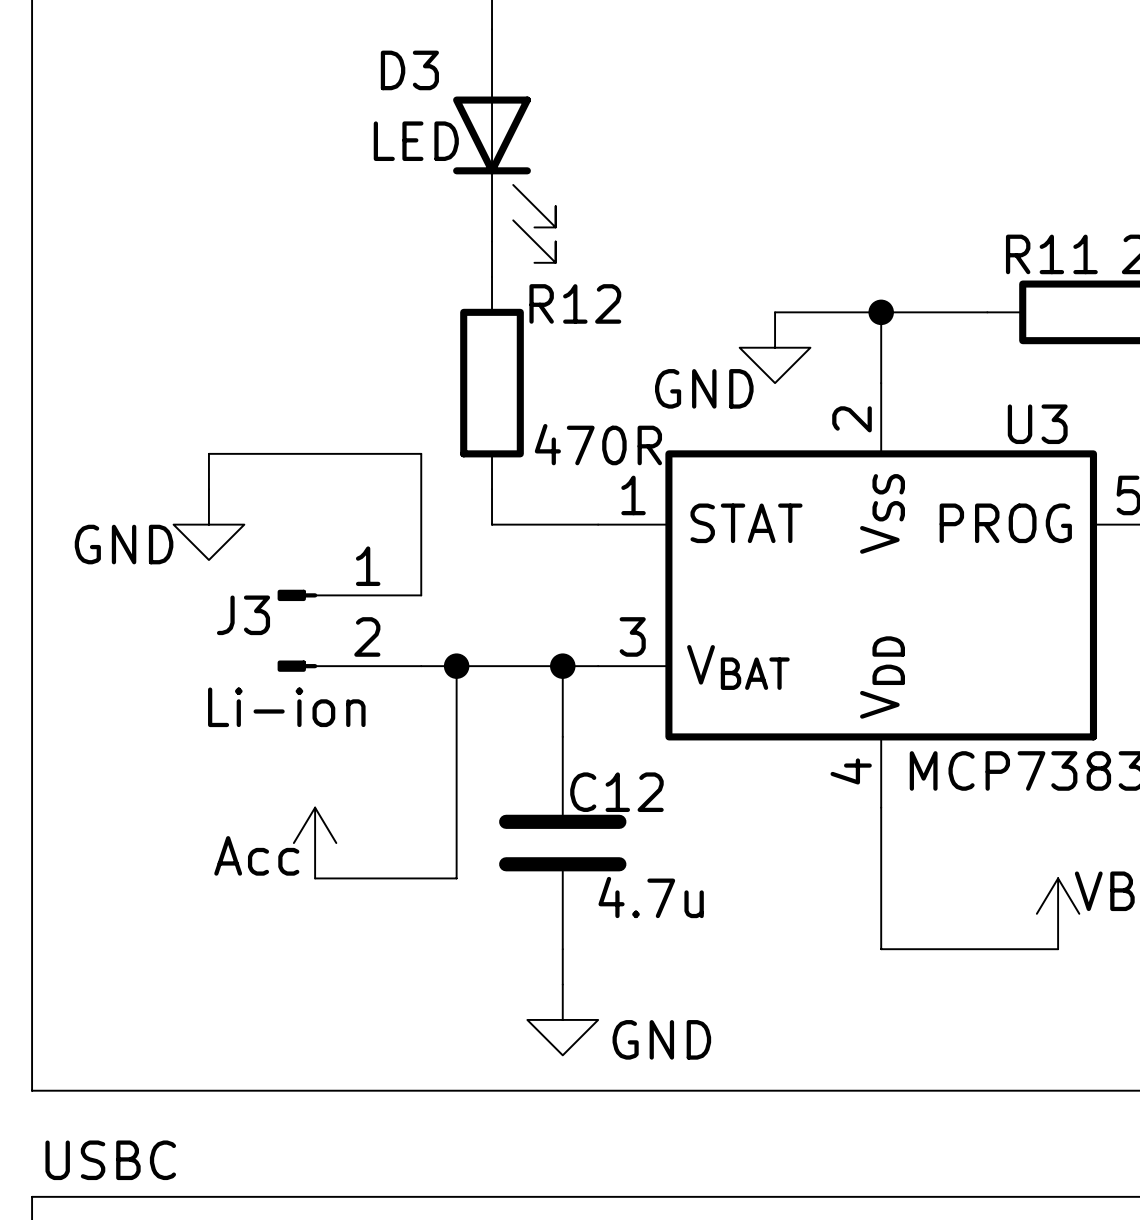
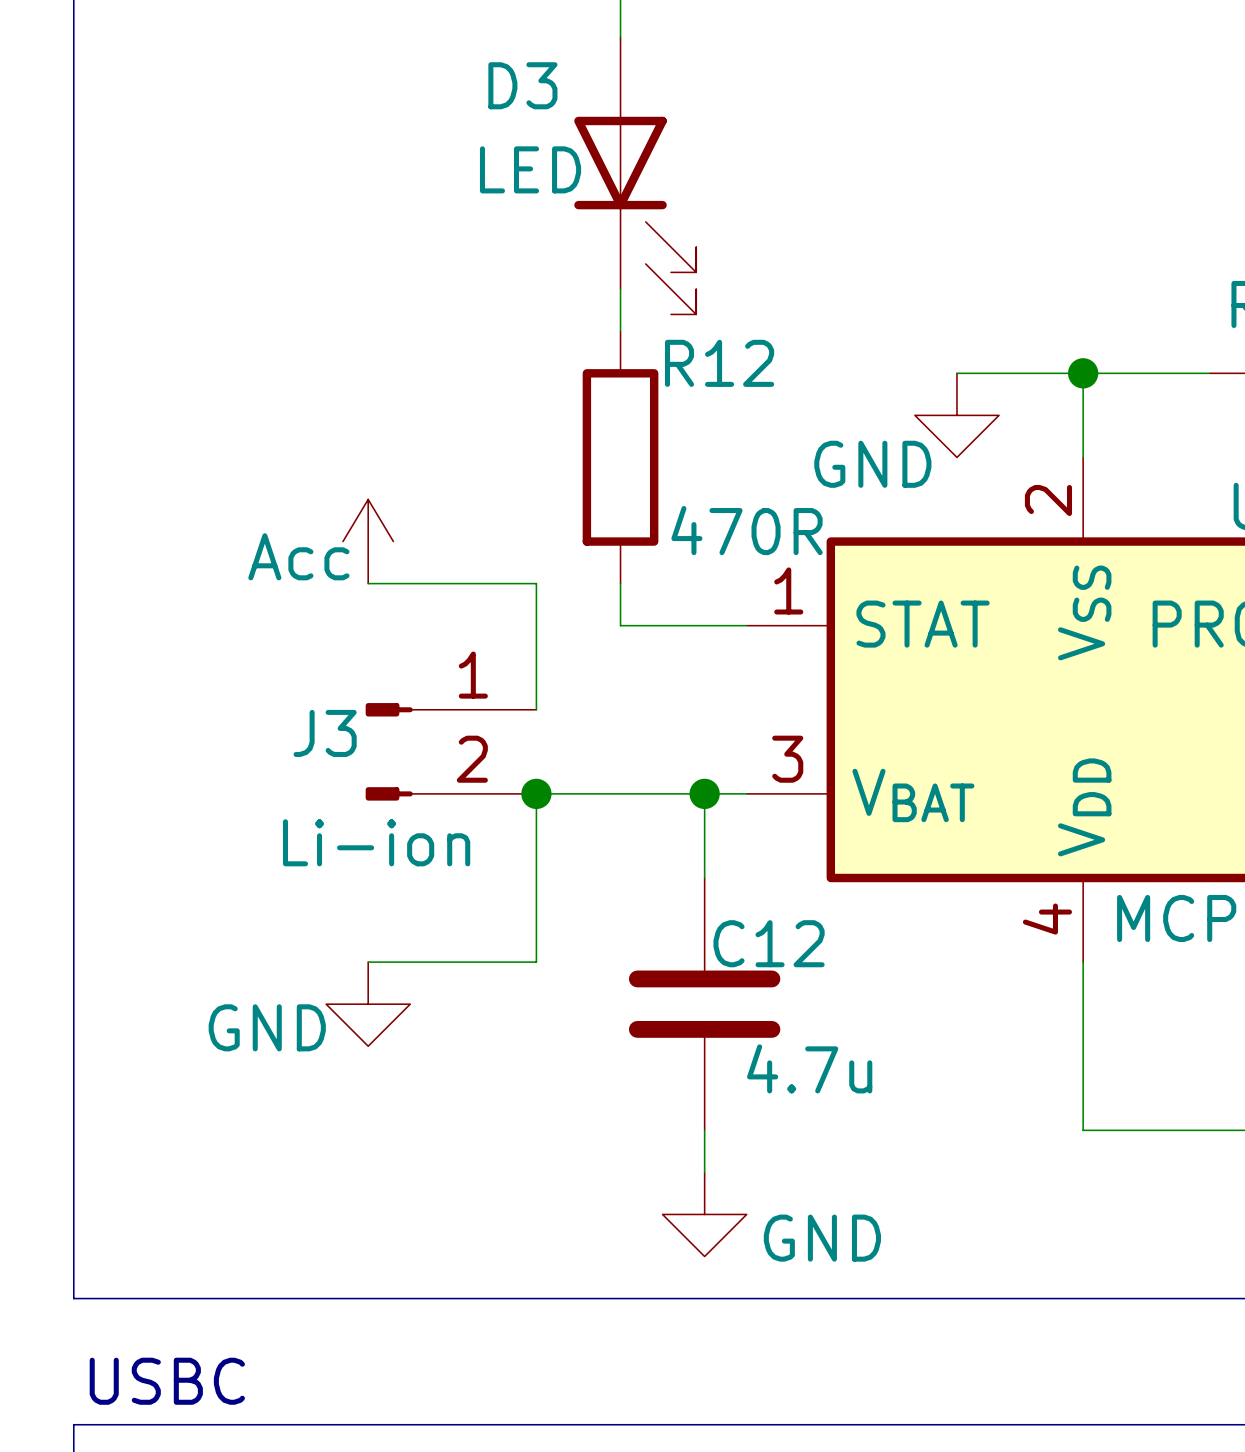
wire: (208, 489) (208, 453) (421, 453) (421, 489) -> (368, 583) (536, 583)
power symbol position: GND (208, 524) -> GND (368, 1004)
wire: none -> (536, 793) (536, 962) (368, 962)
wire: (456, 666) (456, 878) (315, 878) -> none
junction position: (456, 666) -> (536, 793)
power symbol position: Acc (315, 843) -> Acc (368, 541)

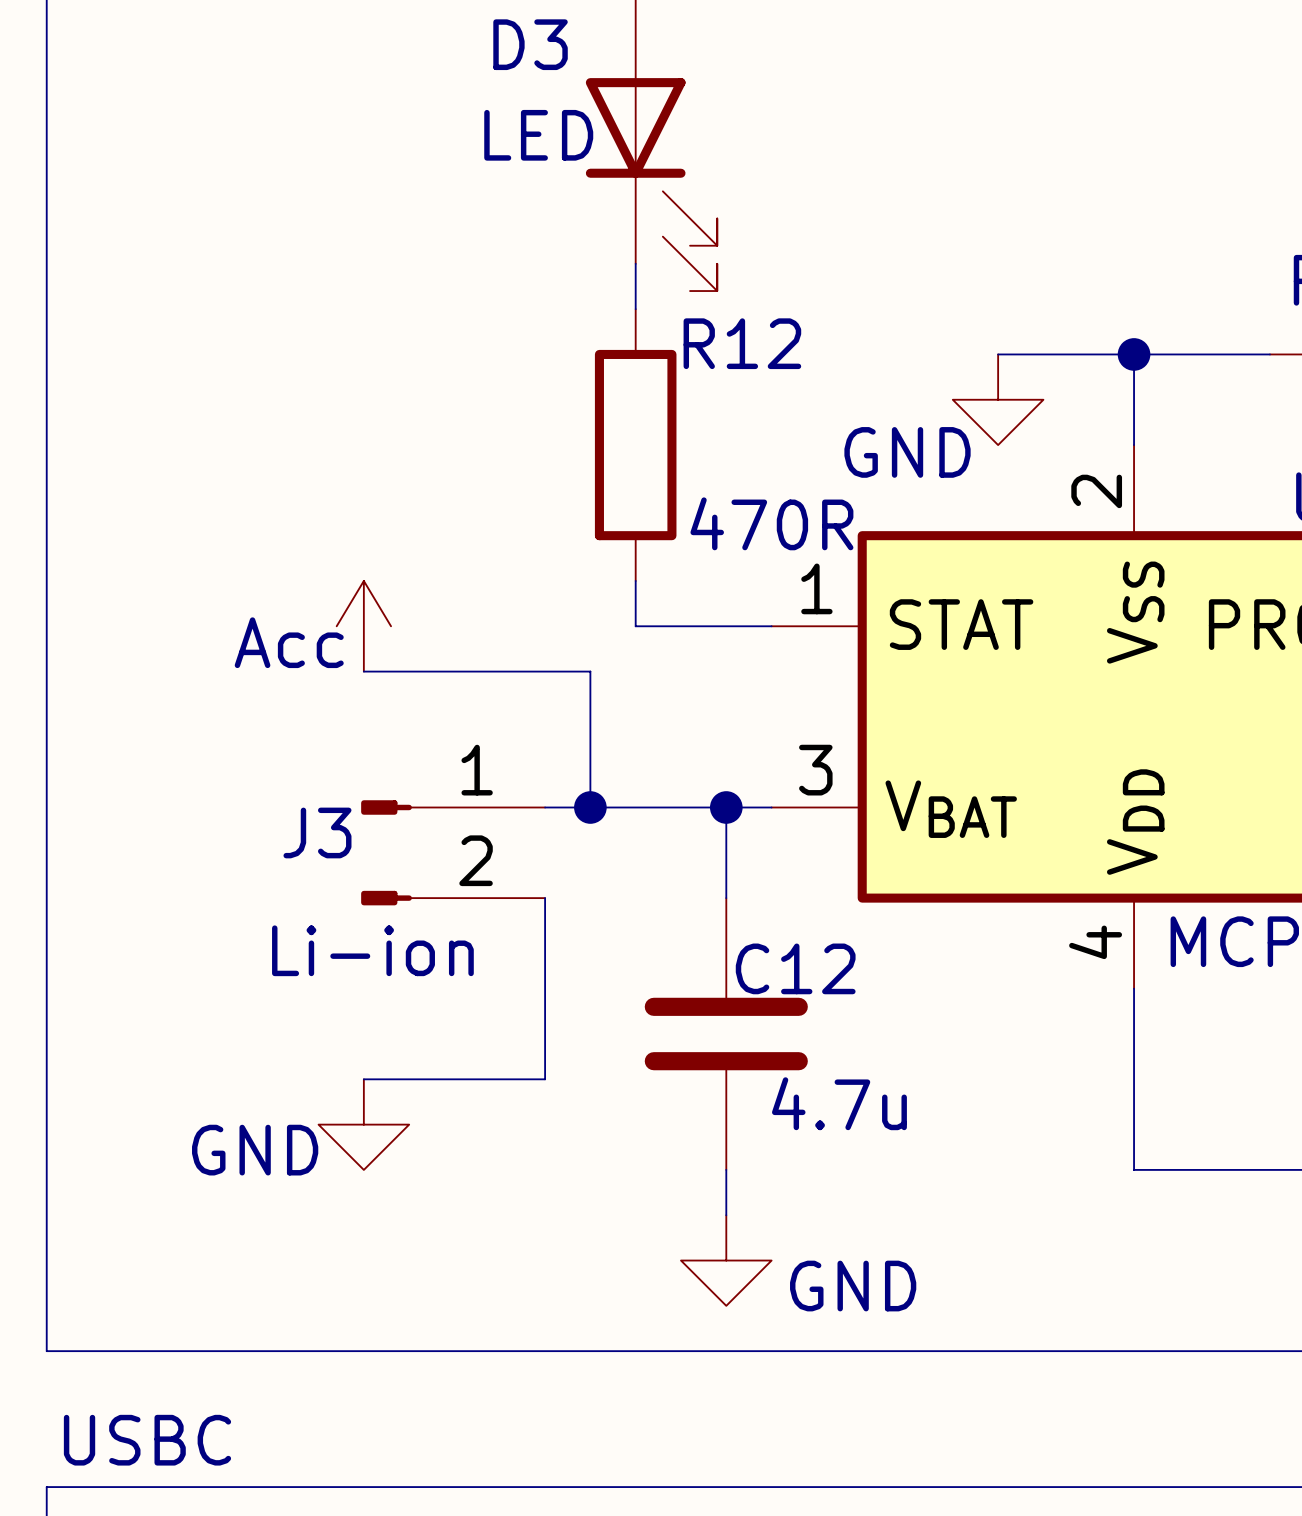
power symbol position: Acc (368, 541) -> Acc (363, 626)
wire: (368, 583) (536, 583) (536, 709) -> none
wire: none -> (363, 671) (590, 671) (590, 807)
J3 position: (451, 751) -> (453, 852)
wire: (536, 793) (536, 878) -> none
junction position: (536, 793) -> (590, 807)
wire: (368, 962) (536, 962) -> (363, 1079) (545, 1079) (545, 988)
power symbol position: GND (368, 1004) -> GND (363, 1124)

